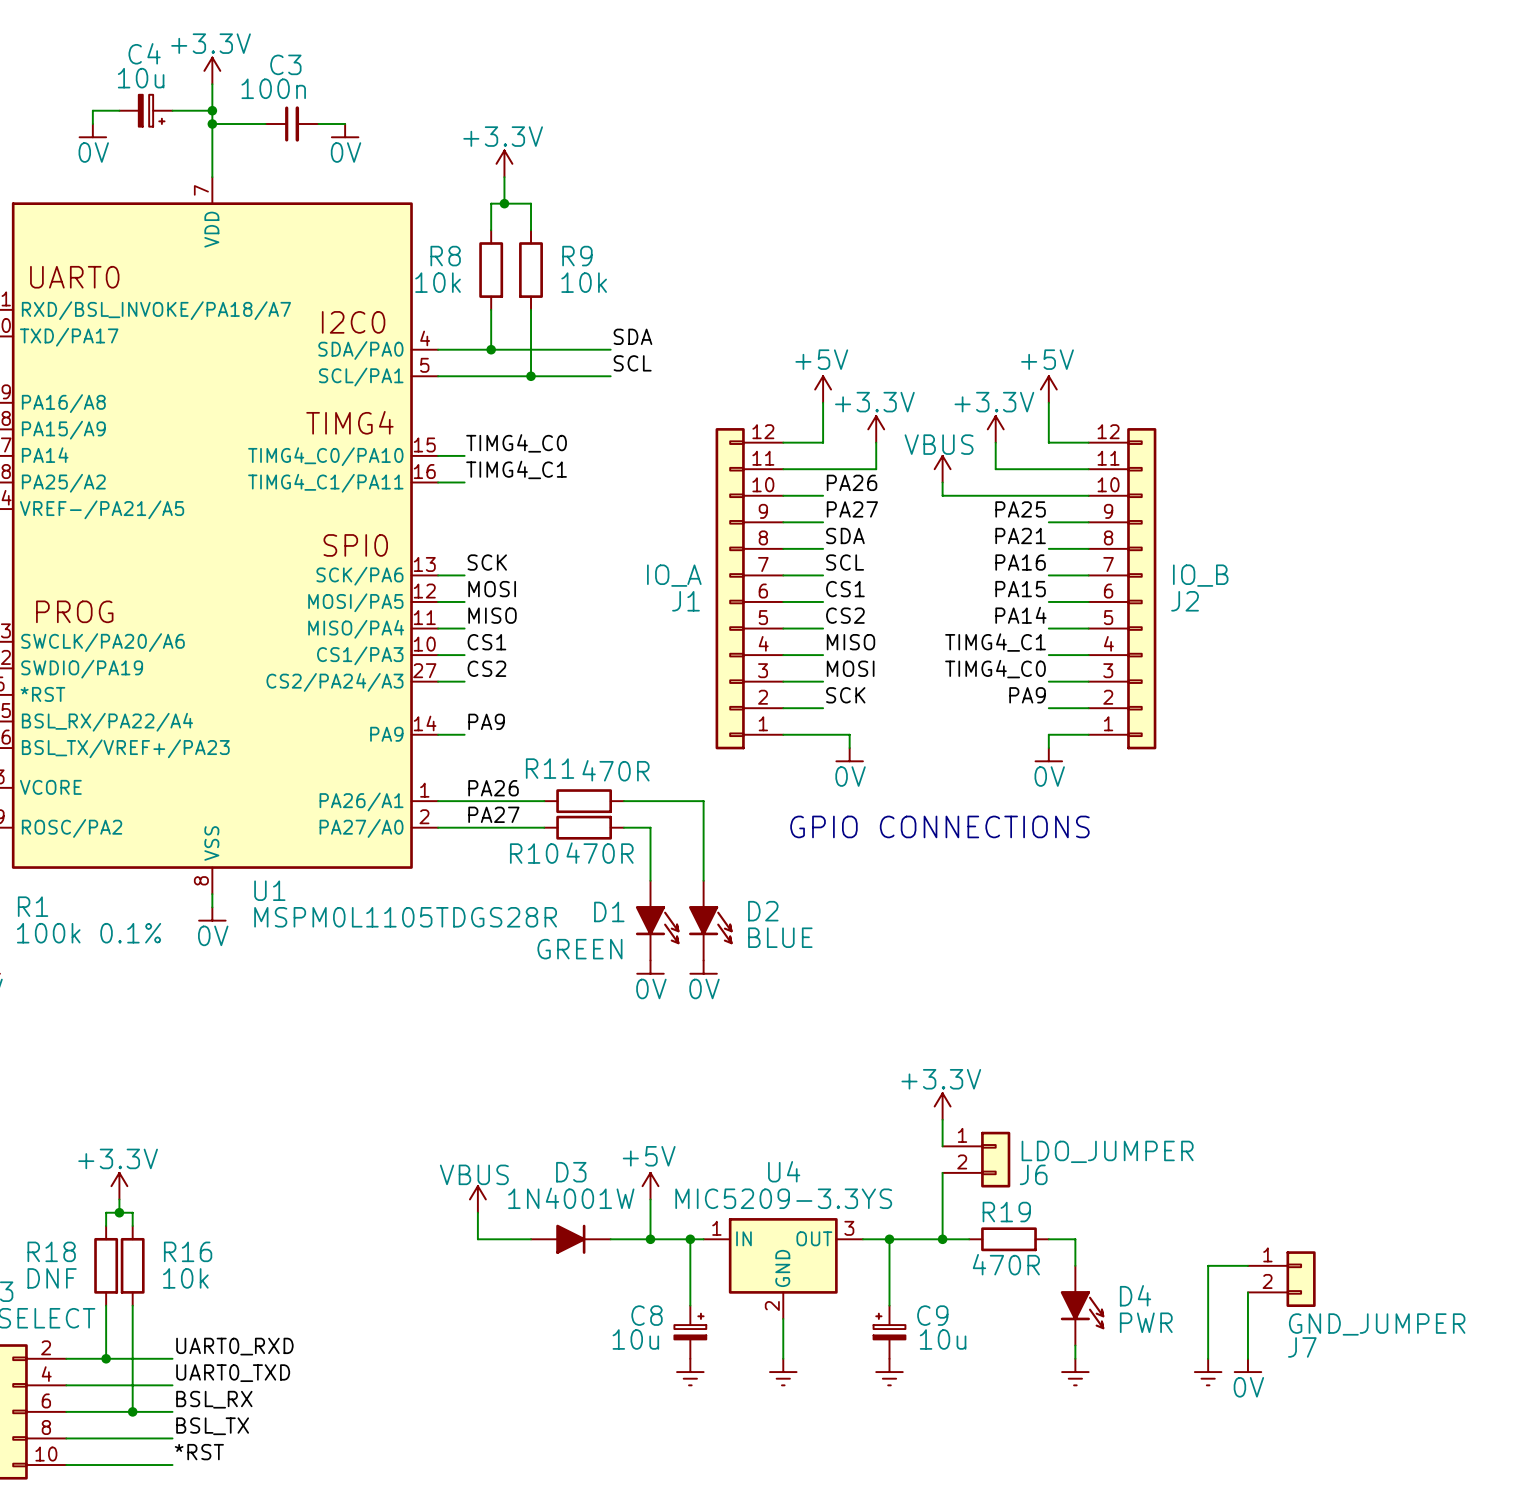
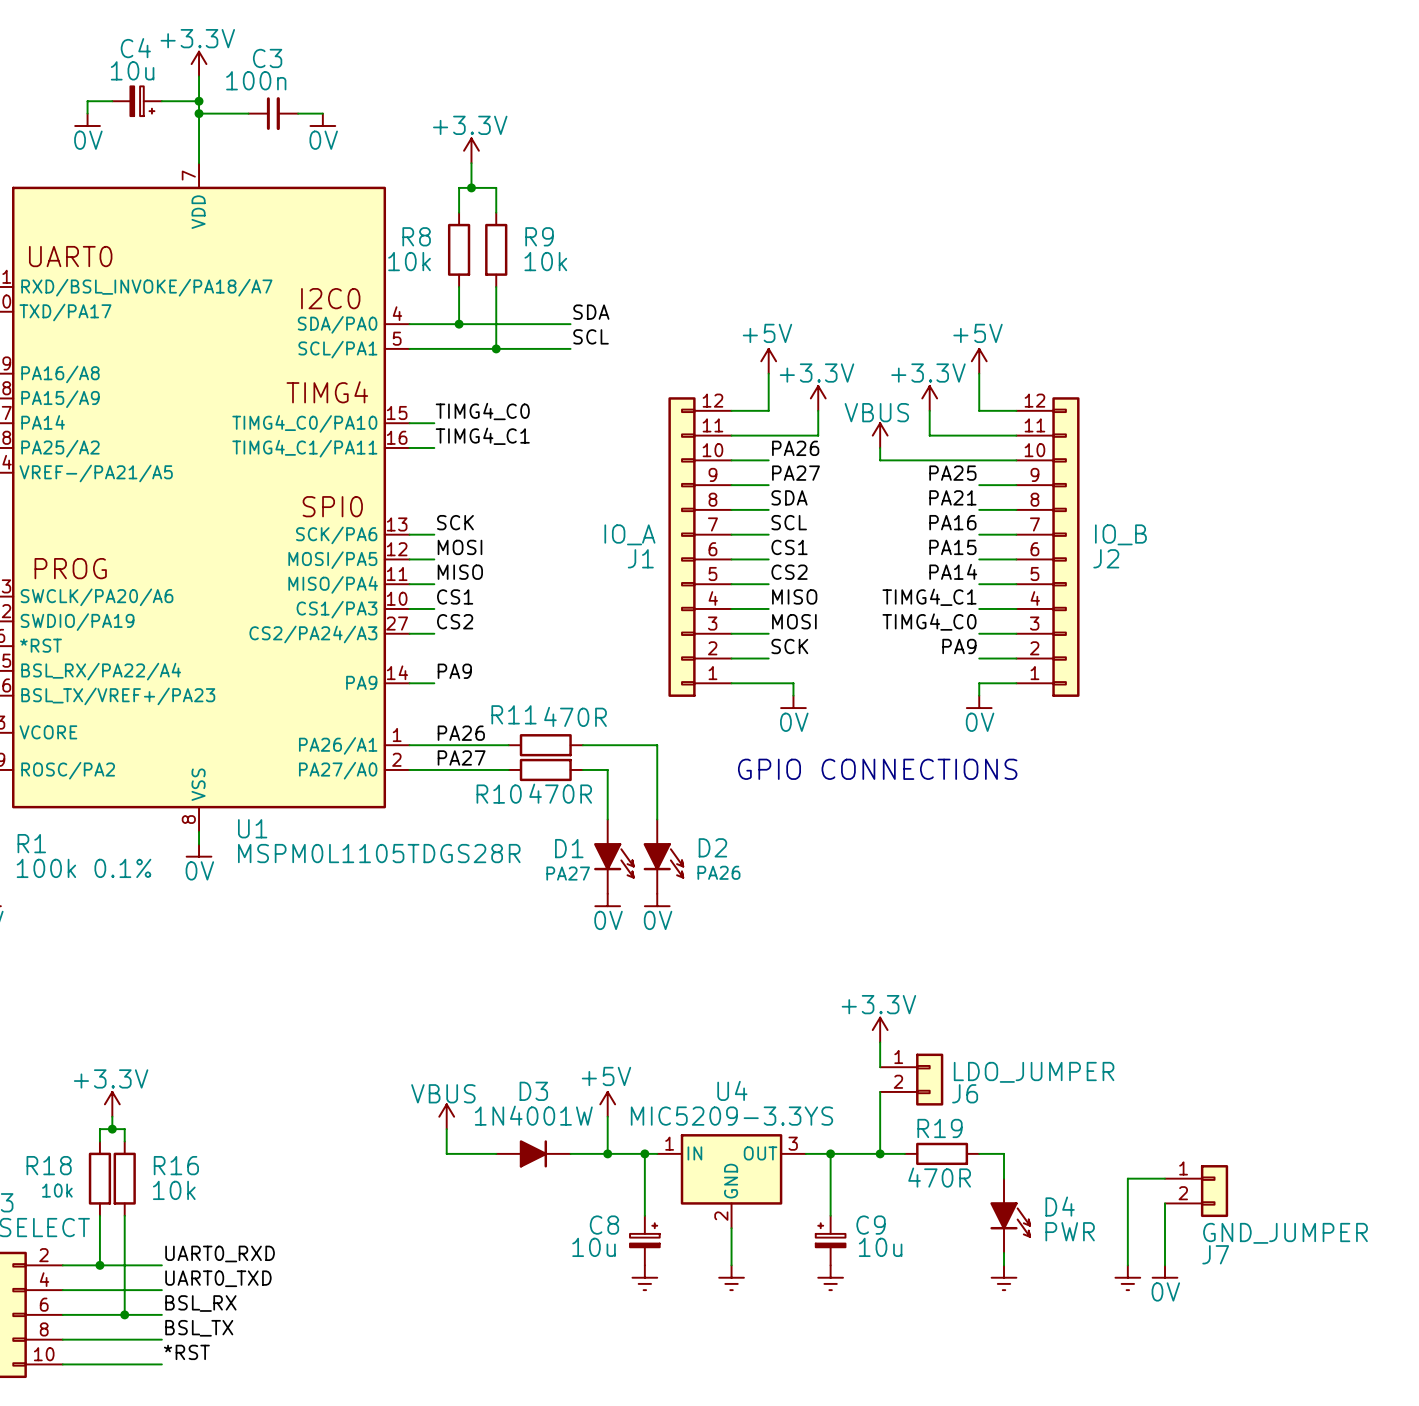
D2 value: BLUE (780, 937) -> PA26 (718, 872)
D1 value: GREEN (579, 949) -> PA27 (568, 873)
R18 value: DNF (52, 1278) -> 10k (57, 1190)

